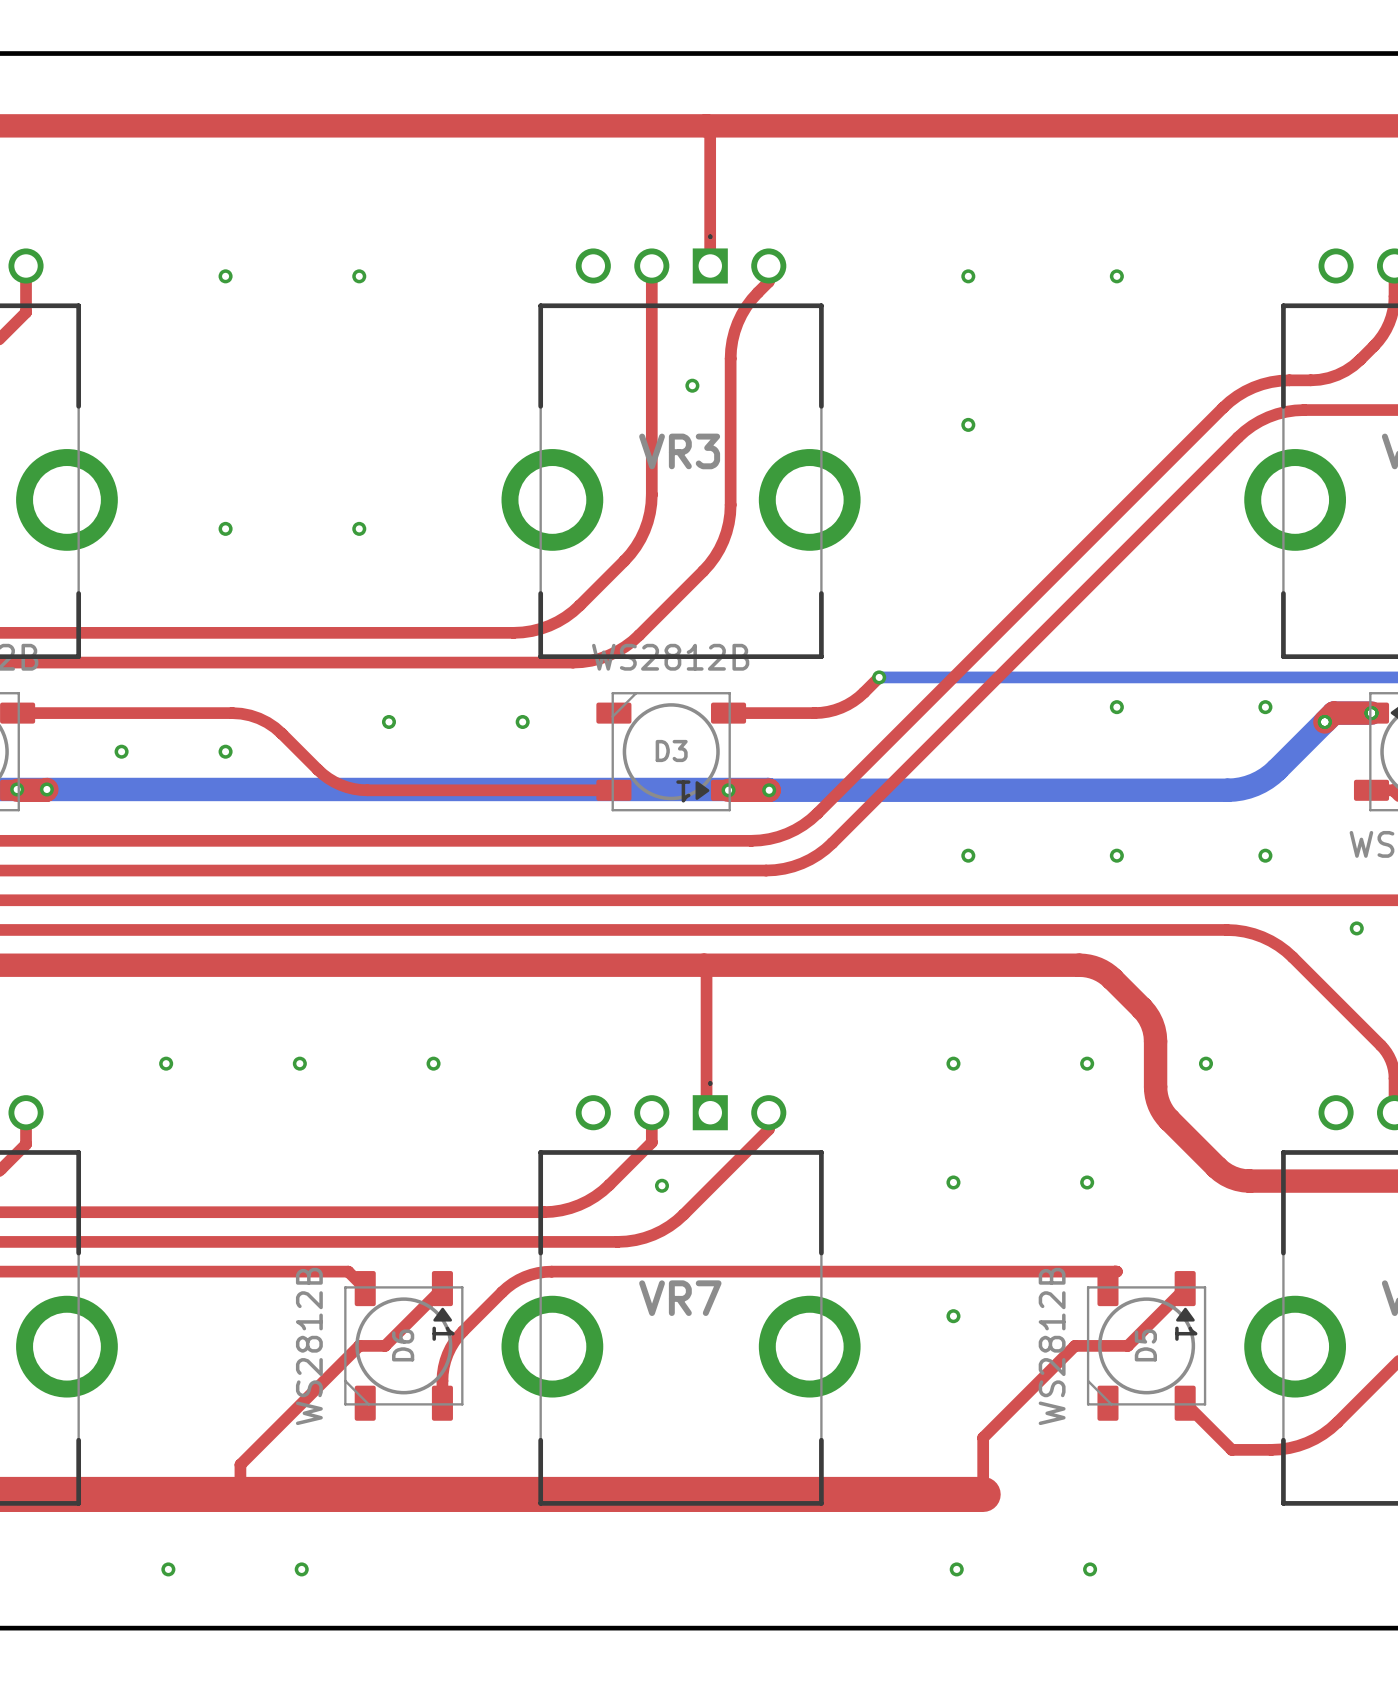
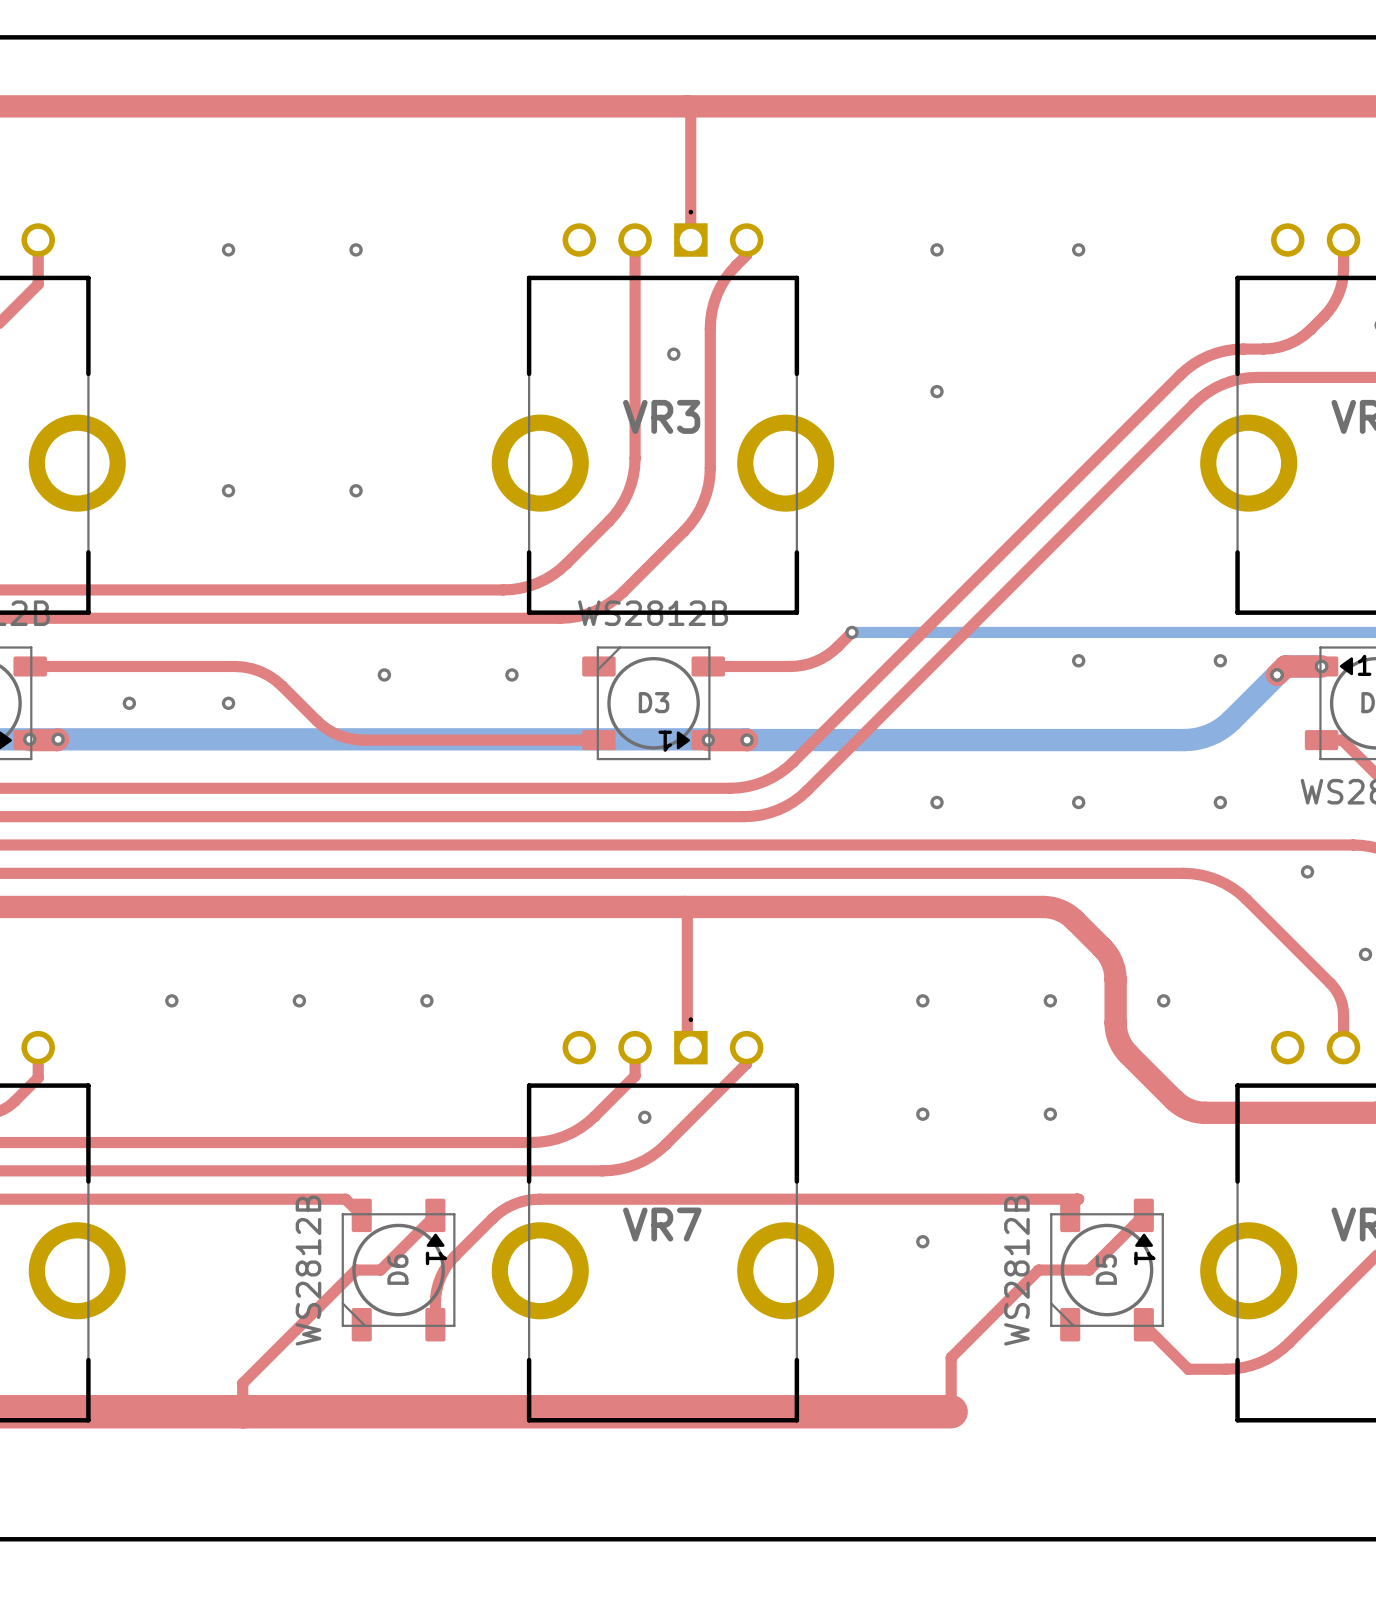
via: (168, 1569) -> none
via: (301, 1569) -> none
via: (956, 1569) -> none
via: (1090, 1569) -> none

